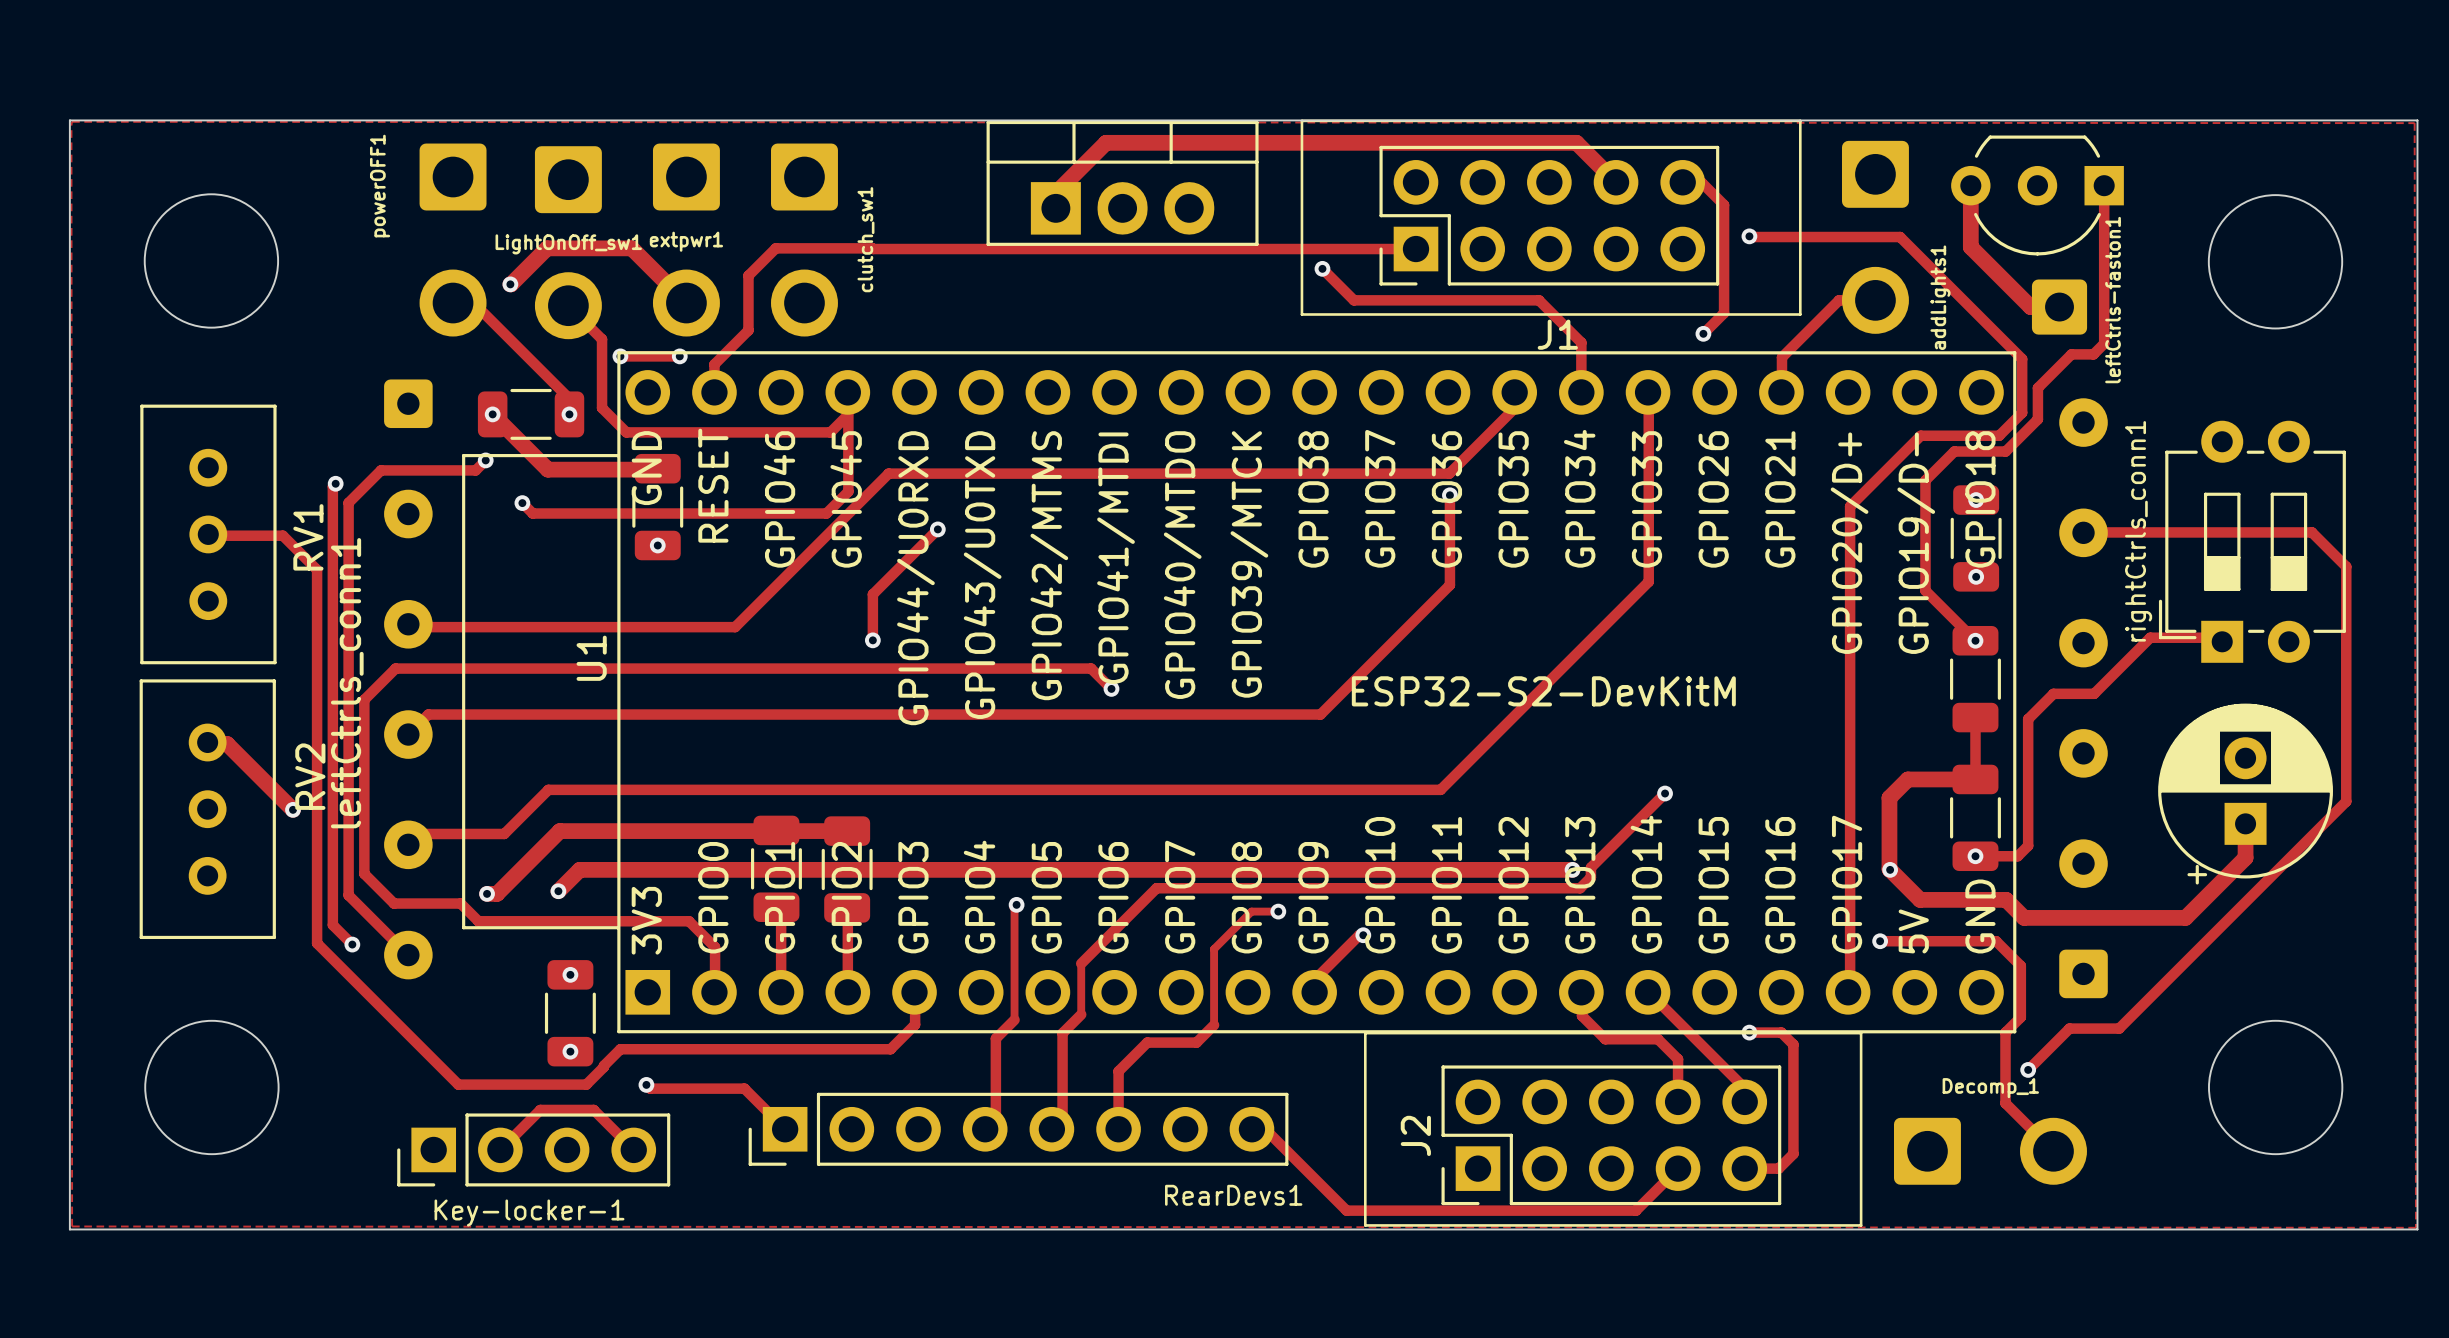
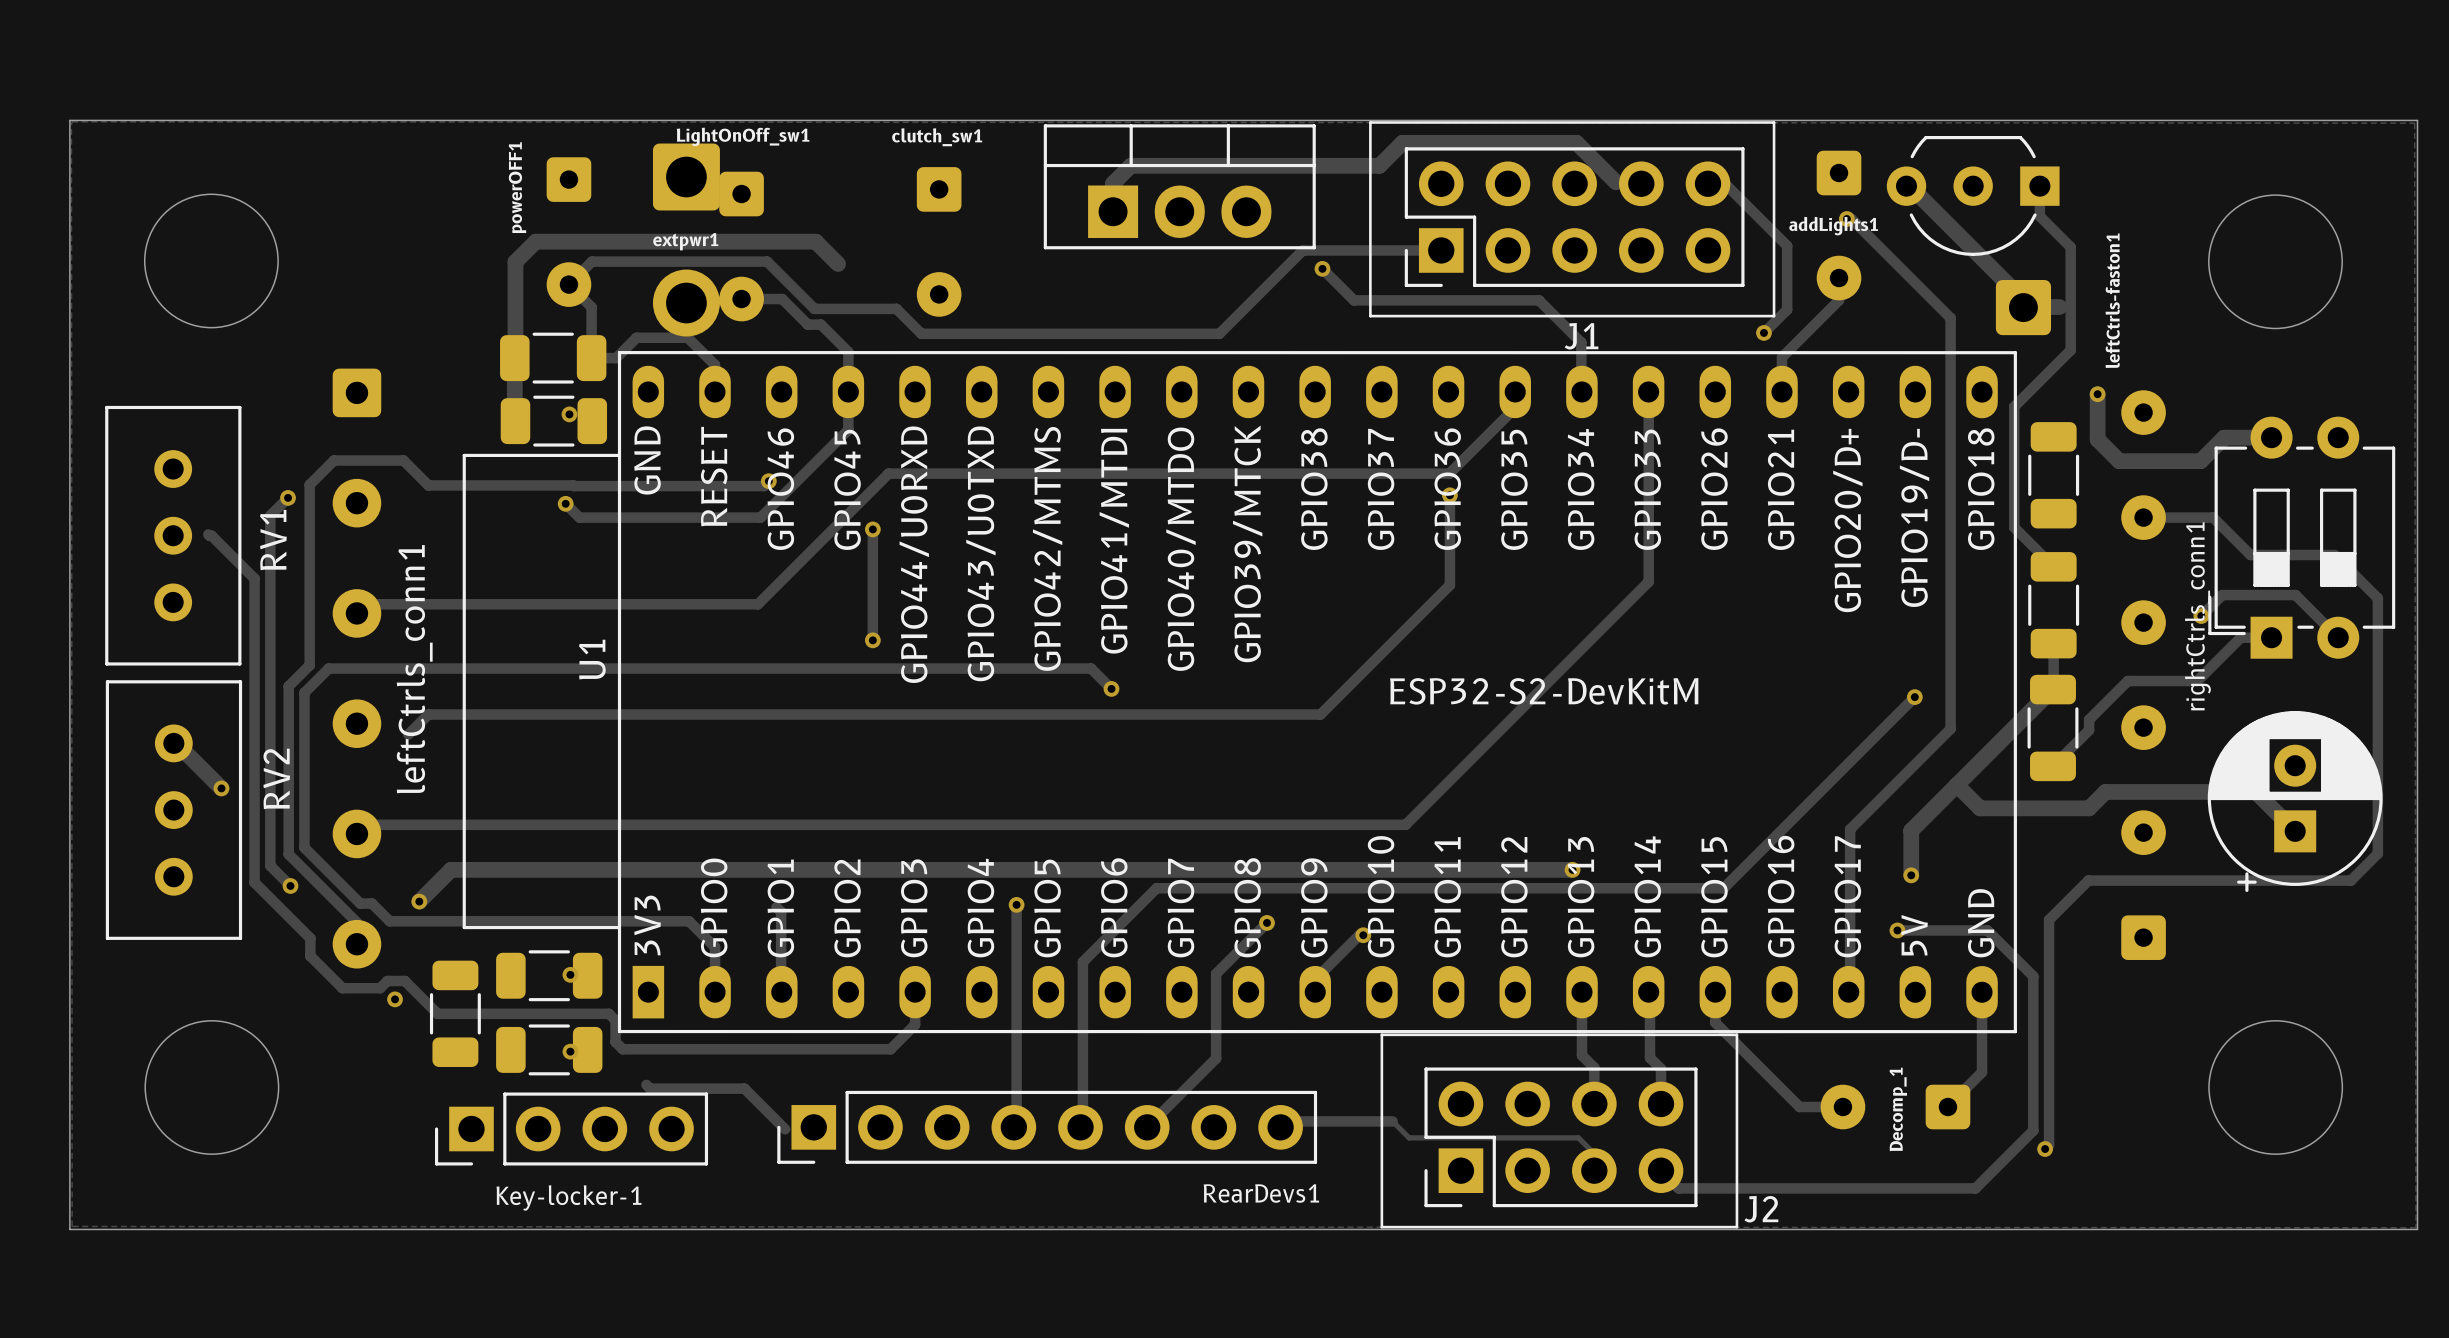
line: (1301, 120) (1800, 120) (1800, 314) (1301, 314) (1301, 120) -> (1370, 122) (1370, 316) (1774, 316) (1774, 122) (1370, 122)
addLights1 footprint: [1841, 140, 1909, 334] -> [1816, 150, 1862, 301]
track: (1402, 142) (1106, 142) (1055, 193) (1055, 208) -> (1402, 142) (1379, 165) (1130, 165) (1113, 183) (1113, 211)
powerOFF1 footprint: [419, 143, 487, 337] -> [546, 157, 592, 307]
clutch_sw1 footprint: [771, 143, 838, 337] -> [916, 167, 962, 317]
LightOnOff_sw1 footprint: [534, 146, 602, 340] -> [719, 171, 764, 322]
track: (1682, 182) (1701, 182) (1724, 205) (1724, 313) (1703, 333) -> none
part position: (1122, 183) -> (1179, 186)
track: none -> (1708, 183) (1725, 183) (1787, 245) (1787, 309) (1763, 332)
track: (1970, 185) (1970, 247) -> (1906, 186) (1909, 186) (1970, 247)
track: (2104, 185) (2104, 343) (2093, 354) (2071, 354) (2037, 387) (2037, 419) (2005, 451) (1954, 451) (1925, 480) (1925, 590) (1975, 640) -> none
track: none -> (2039, 186) (2039, 216) (2070, 247) (2070, 350) (2014, 406) (2014, 527) (2053, 566) (2058, 561)
part position: (2037, 195) -> (1973, 195)
J1 position: (1549, 215) -> (1574, 217)
via: none -> (1846, 218)
track: (1749, 236) (1900, 237) (2022, 359) (2022, 412) (1999, 435) (1920, 435) (1850, 506) (1850, 829) -> (1846, 218) (1851, 218) (1950, 318) (1950, 728) (1850, 829)
via: (1749, 236) -> none
clutch_sw1 name position: clutch_sw1 (865, 239) -> clutch_sw1 (937, 137)
LightOnOff_sw1 name position: LightOnOff_sw1 (568, 244) -> LightOnOff_sw1 (743, 136)
track: (1415, 249) (775, 248) (748, 275) (748, 330) (714, 364) (714, 392) -> (1441, 250) (1302, 250) (1219, 333) (921, 333) (896, 308) (814, 308) (767, 261) (591, 261) (568, 284) (591, 307) (591, 358) (616, 358) (636, 337) (687, 337) (715, 364) (715, 392)
track: none -> (838, 263) (815, 241) (535, 241) (515, 261) (515, 421)
track: (510, 284) (547, 248) (631, 248) (686, 303) -> none
via: (510, 284) -> none
addLights1 name position: addLights1 (1940, 297) -> addLights1 (1833, 226)
track: (453, 303) (473, 303) (569, 398) (569, 414) -> none
track: (568, 305) (602, 339) (602, 408) (626, 432) (830, 432) (847, 415) (848, 392) -> (741, 299) (782, 299) (807, 324) (821, 324) (848, 352) (848, 392)
leftCtrls-faston1 position: (2059, 307) -> (2023, 307)
via: none -> (1763, 332)
via: (1703, 333) -> none
U1 footprint: [462, 351, 2017, 1034] -> [462, 351, 2017, 1034]
track: (620, 356) (679, 356) -> none
via: (620, 356) -> none
via: (679, 356) -> none
track: none -> (2097, 394) (2097, 439) (2119, 461) (2200, 461) (2224, 437) (2271, 437)
via: none -> (2097, 394)
rightCtrls_conn1 footprint: [2059, 398, 2108, 999] -> [2121, 390, 2166, 960]
track: (492, 414) (547, 469) (657, 468) -> none
via: (492, 414) -> none
part position: (531, 414) -> (553, 421)
track: (848, 429) (848, 491) (826, 513) (532, 513) (522, 503) -> (848, 429) (760, 517) (579, 517) (565, 503)
track: (485, 460) (475, 470) (381, 470) (348, 502) (348, 895) (408, 955) -> none
via: (485, 460) -> none
part: none -> (2053, 475)
track: none -> (768, 481) (763, 486) (428, 485) (403, 460) (333, 460) (309, 484) (309, 665) (288, 686) (288, 854) (356, 922) (356, 944)
via: none -> (768, 481)
track: (335, 483) (332, 486) (332, 925) (352, 944) -> none
via position: (335, 483) -> (288, 497)
track: none -> (288, 497) (270, 515) (270, 865) (290, 885)
via: (1976, 500) -> none
via position: (522, 503) -> (565, 503)
part rotation: 0° (657, 507) -> 90° clockwise (553, 358)
part position: (657, 507) -> (553, 358)
track: (937, 529) (872, 594) -> (872, 529) (872, 594)
via position: (937, 529) -> (872, 529)
rightCtrls_conn1 name position: rightCtrls_conn1 (2138, 531) -> rightCtrls_conn1 (2197, 616)
track: (2083, 532) (2312, 532) (2334, 555) -> (2143, 517) (2213, 517) (2250, 555) (2334, 555)
RV1 position: (208, 534) -> (173, 535)
track: (211, 535) (282, 535) (317, 569) (317, 943) (458, 1084) (586, 1084) (620, 1049) (622, 1049) -> (211, 535) (254, 578) (254, 882) (310, 938) (310, 956) (342, 988) (380, 988) (387, 980) (404, 980) (437, 1013) (609, 1013) (615, 1020) (615, 1042) (622, 1049)
part: (1976, 538) -> none
part position: (2252, 541) -> (2301, 537)
via: (657, 545) -> none
track: (2346, 566) (2346, 801) (2119, 1028) (2069, 1028) (2028, 1069) -> (2346, 566) (2377, 598) (2377, 853) (2350, 880) (2088, 880) (2049, 919) (2049, 1145) (2045, 1149)
via: (1976, 576) -> none
track: (758, 604) (735, 627) (411, 627) (408, 624) -> (758, 604) (366, 604) (356, 613)
part: none -> (2053, 605)
track: none -> (2201, 616) (2222, 595) (2295, 595) (2338, 637)
via: none -> (2201, 616)
track: none -> (2271, 637) (2240, 637) (2197, 681) (2127, 681) (2089, 719) (2089, 730) (2052, 766)
via: (1975, 640) -> none
track: (2222, 641) (2218, 637) (2150, 637) (2094, 693) (2053, 693) (2028, 719) (2028, 845) (2017, 856) (1975, 856) -> none
track: none -> (2053, 643) (2053, 688) (1911, 830) (1911, 875)
track: (395, 668) (364, 699) (364, 873) (394, 903) (460, 903) (478, 921) -> (395, 668) (328, 668) (304, 692) (304, 847) (360, 903) (372, 903) (389, 921) (478, 921)
leftCtrls_conn1 position: (408, 679) -> (356, 668)
part: (1975, 679) -> none
leftCtrls_conn1 name position: leftCtrls_conn1 (347, 683) -> leftCtrls_conn1 (414, 669)
via: none -> (1914, 697)
track: (1975, 717) (1975, 779) (1907, 779) (1889, 797) (1889, 869) (1920, 899) (2006, 899) (2024, 917) (2185, 917) (2245, 857) (2245, 823) -> none
part: none -> (2052, 727)
track: (207, 742) (227, 744) (292, 809) -> none
track: none -> (173, 743) (177, 744) (221, 788)
track: none -> (1956, 785) (1980, 808) (2089, 808) (2105, 791) (2255, 791) (2295, 831)
via: none -> (221, 788)
track: (1440, 789) (548, 789) (504, 833) (419, 833) (408, 844) -> (1440, 789) (1405, 824) (366, 824) (356, 833)
track: (1665, 793) (1590, 867) (1590, 877) (1580, 888) -> (1914, 697) (1723, 888) (1580, 888)
via: (1665, 793) -> none
part position: (2245, 794) -> (2295, 801)
RV2 position: (207, 809) -> (173, 810)
via: (292, 809) -> none
part: (1975, 817) -> none
track: (847, 831) (559, 831) (497, 893) (487, 893) -> none
via: (1975, 856) -> none
part: (776, 868) -> none
track: (579, 869) (558, 891) -> (579, 869) (451, 869) (419, 901)
part: (847, 869) -> none
via position: (1890, 869) -> (1911, 875)
via: none -> (290, 885)
via: (558, 891) -> none
via: (487, 893) -> none
via: none -> (419, 901)
track: (1016, 904) (1014, 906) (1014, 1019) (995, 1038) (995, 1118) (985, 1129) -> (1016, 904) (1016, 1124) (1013, 1127)
track: (847, 907) (847, 992) -> none
track: (1278, 911) (1251, 911) (1214, 949) (1214, 1025) (1196, 1042) (1147, 1042) (1118, 1071) (1118, 1129) -> none
via position: (1278, 911) -> (1267, 922)
track: none -> (1267, 922) (1216, 973) (1216, 1058) (1147, 1127)
track: none -> (1897, 930) (1987, 930) (2033, 976) (2033, 1130) (1975, 1188) (1678, 1188) (1661, 1170)
track: (1880, 941) (1996, 941) (2020, 965) (2020, 1017) (2005, 1032) (2005, 1103) (2053, 1151) -> none
via position: (1880, 941) -> (1897, 930)
via: (352, 944) -> none
track: (1082, 961) (1081, 963) (1081, 1014) (1062, 1033) (1062, 1118) (1051, 1129) -> (1082, 961) (1082, 1125) (1080, 1127)
part: none -> (549, 975)
track: none -> (1982, 992) (1982, 1072) (1947, 1107)
track: (1649, 993) (1744, 1088) (1744, 1101) -> (1649, 993) (1649, 1057) (1661, 1068) (1661, 1103)
via: none -> (395, 999)
track: none -> (1715, 1008) (1715, 1022) (1799, 1107) (1842, 1107)
part: none -> (455, 1013)
part: (570, 1013) -> none
track: (1581, 1015) (1605, 1039) (1658, 1039) (1678, 1059) (1678, 1101) -> (1581, 1015) (1581, 1055) (1594, 1067) (1594, 1103)
track: (1749, 1032) (1781, 1032) (1793, 1044) (1793, 1153) (1778, 1168) (1744, 1168) -> none
via: (1749, 1032) -> none
line: (1365, 1033) (1861, 1033) (1861, 1225) (1365, 1225) (1365, 1033) -> (1381, 1034) (1381, 1227) (1736, 1227) (1736, 1034) (1381, 1034)
part: none -> (549, 1049)
J2 footprint: [1441, 1065, 1782, 1206] -> [1424, 1067, 1698, 1208]
via position: (2028, 1069) -> (2045, 1149)
via: (646, 1084) -> none
Decomp_1 name position: Decomp_1 (1990, 1088) -> Decomp_1 (1898, 1109)
Decomp_1 footprint: [1894, 1117, 2087, 1185] -> [1820, 1084, 1971, 1130]
track: none -> (1280, 1127) (1286, 1121) (1392, 1121) (1409, 1137) (1578, 1137) (1594, 1153) (1594, 1170)
RearDevs1 position: (1018, 1129) -> (1047, 1127)
track: (1251, 1129) (1265, 1129) (1346, 1210) (1636, 1210) (1678, 1168) -> none
J2 name position: J2 (1415, 1135) -> J2 (1761, 1209)
track: (500, 1149) (540, 1109) (593, 1109) (633, 1149) -> none
Key-locker-1 position: (533, 1149) -> (571, 1129)
Key-locker-1 name position: Key-locker-1 (529, 1213) -> Key-locker-1 (568, 1197)

